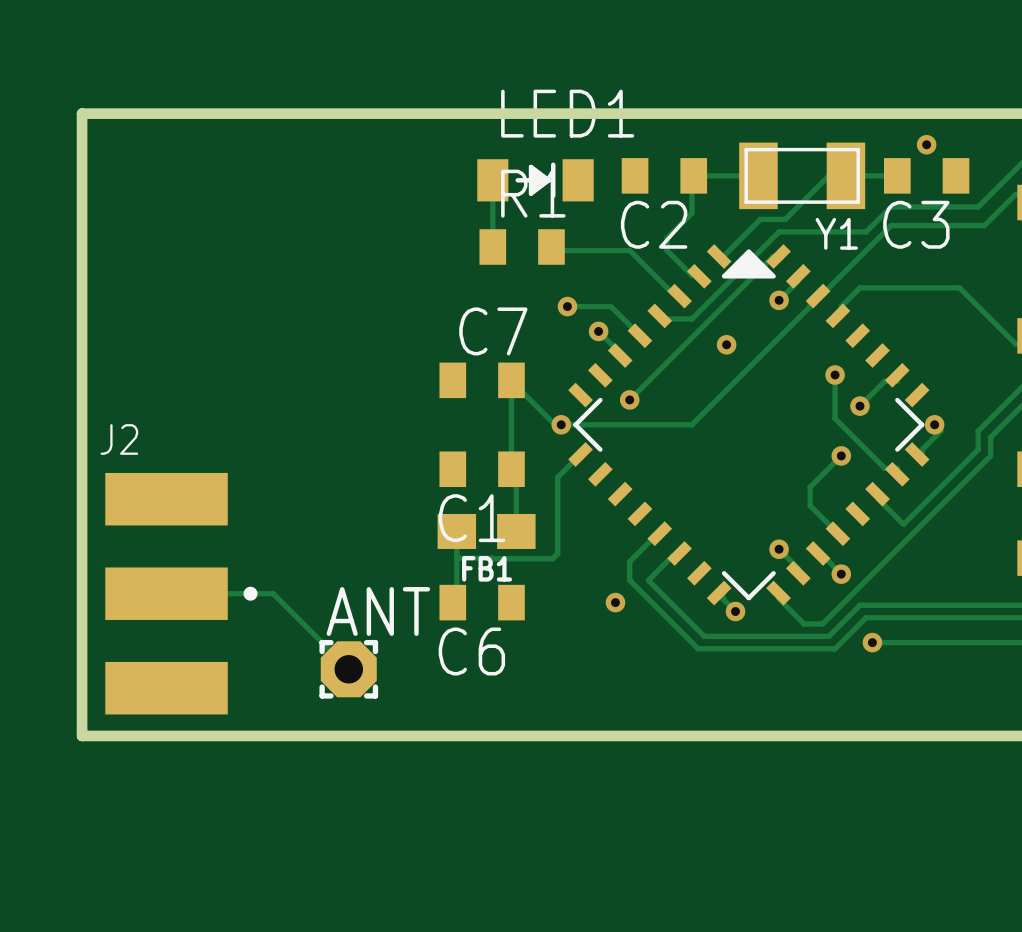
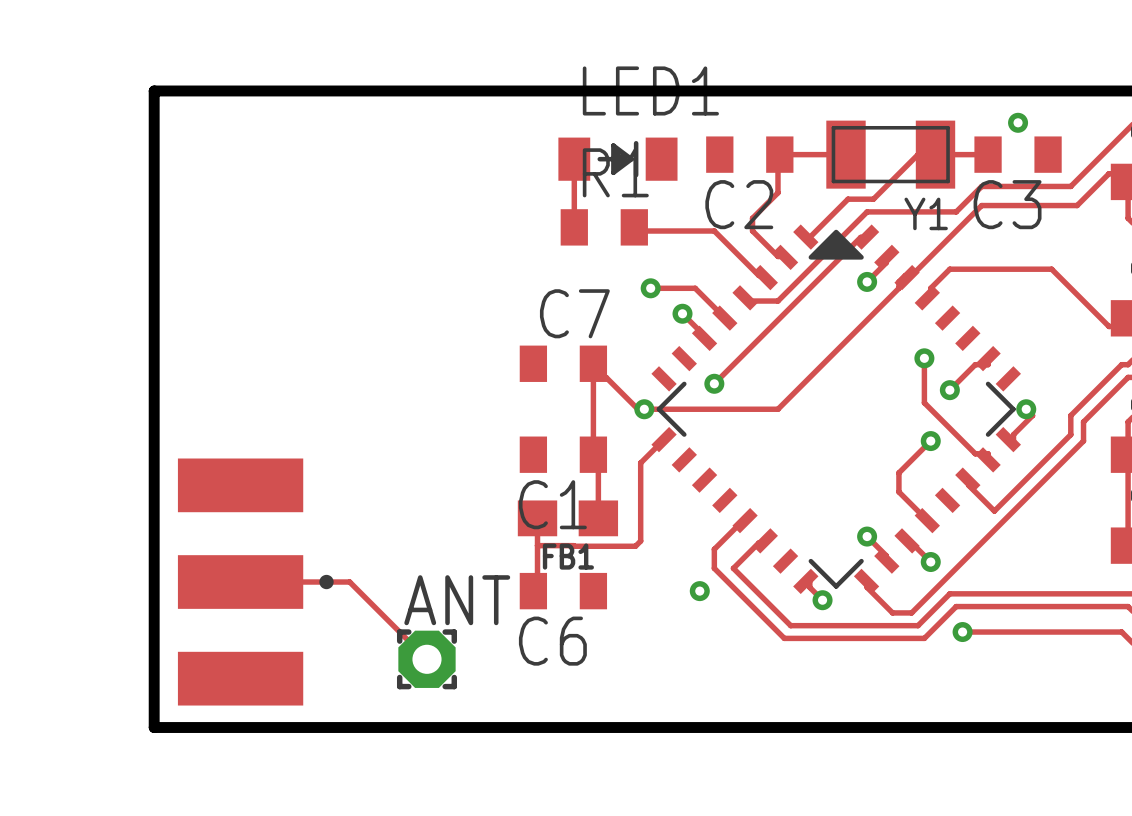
via: (726, 344) -> none
J2 name: J2 (119, 439) -> none

